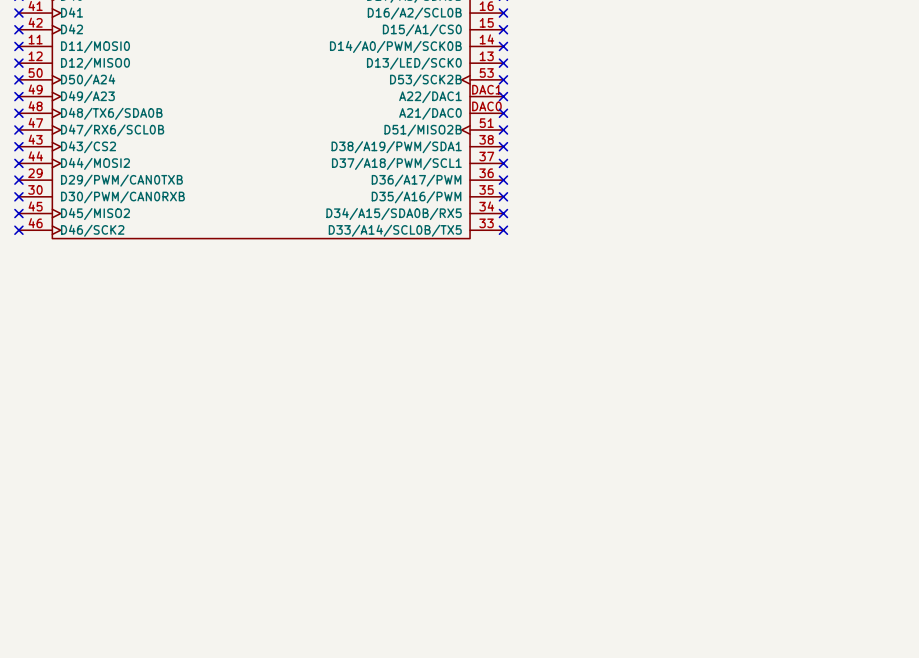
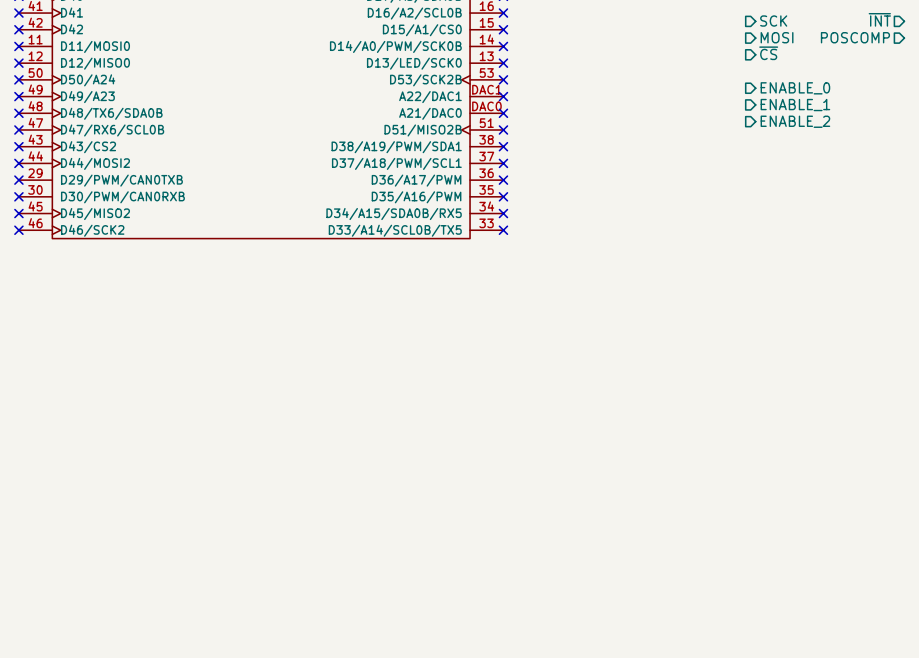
sheet pin: none -> ~{INT} (879, 19)
sheet pin: none -> SCK (773, 21)
sheet pin: none -> MOSI (777, 37)
sheet pin: none -> POSCOMP (855, 37)
sheet pin: none -> ~{CS} (768, 53)
sheet pin: none -> ENABLE_0 (795, 88)
sheet pin: none -> ENABLE_1 (795, 105)
sheet pin: none -> ENABLE_2 (795, 121)

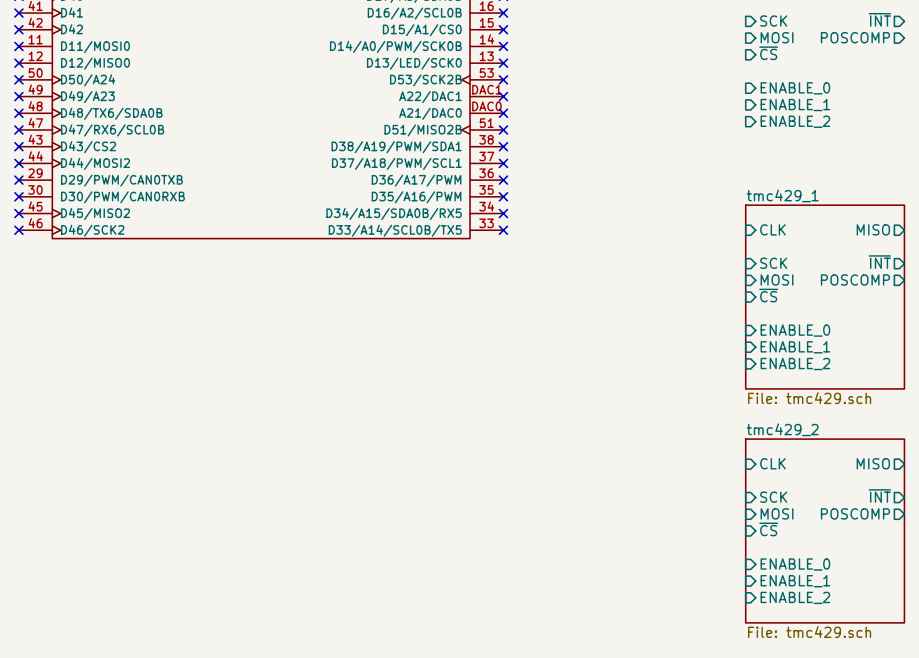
sheet pin: none -> CLK (772, 229)
sheet pin: none -> MISO (873, 229)
sheet pin: none -> ~{INT} (879, 262)
sheet pin: none -> SCK (773, 263)
sheet pin: none -> MOSI (777, 279)
sheet pin: none -> POSCOMP (855, 279)
sheet pin: none -> ~{CS} (768, 295)
sheet tmc429_1: none -> File: tmc429.sch (825, 297)
sheet pin: none -> ENABLE_0 (795, 330)
sheet pin: none -> ENABLE_1 (795, 347)
sheet pin: none -> ENABLE_2 (795, 364)
sheet pin: none -> CLK (772, 463)
sheet pin: none -> MISO (873, 463)
sheet pin: none -> ~{INT} (879, 496)
sheet pin: none -> SCK (773, 497)
sheet pin: none -> MOSI (777, 513)
sheet pin: none -> POSCOMP (855, 513)
sheet pin: none -> ~{CS} (768, 529)
sheet tmc429_2: none -> File: tmc429.sch (825, 530)
sheet pin: none -> ENABLE_0 (795, 564)
sheet pin: none -> ENABLE_1 (795, 581)
sheet pin: none -> ENABLE_2 (795, 597)

